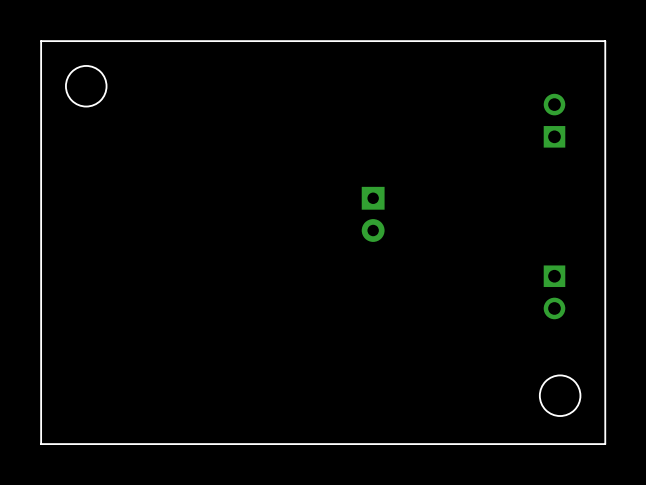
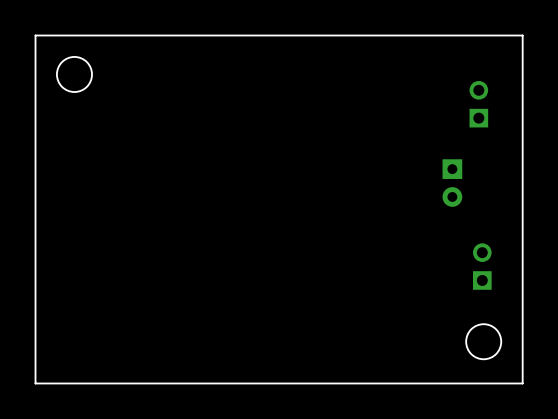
part position: (373, 214) -> (452, 183)
part rotation: 0° (554, 292) -> 180° (482, 266)

